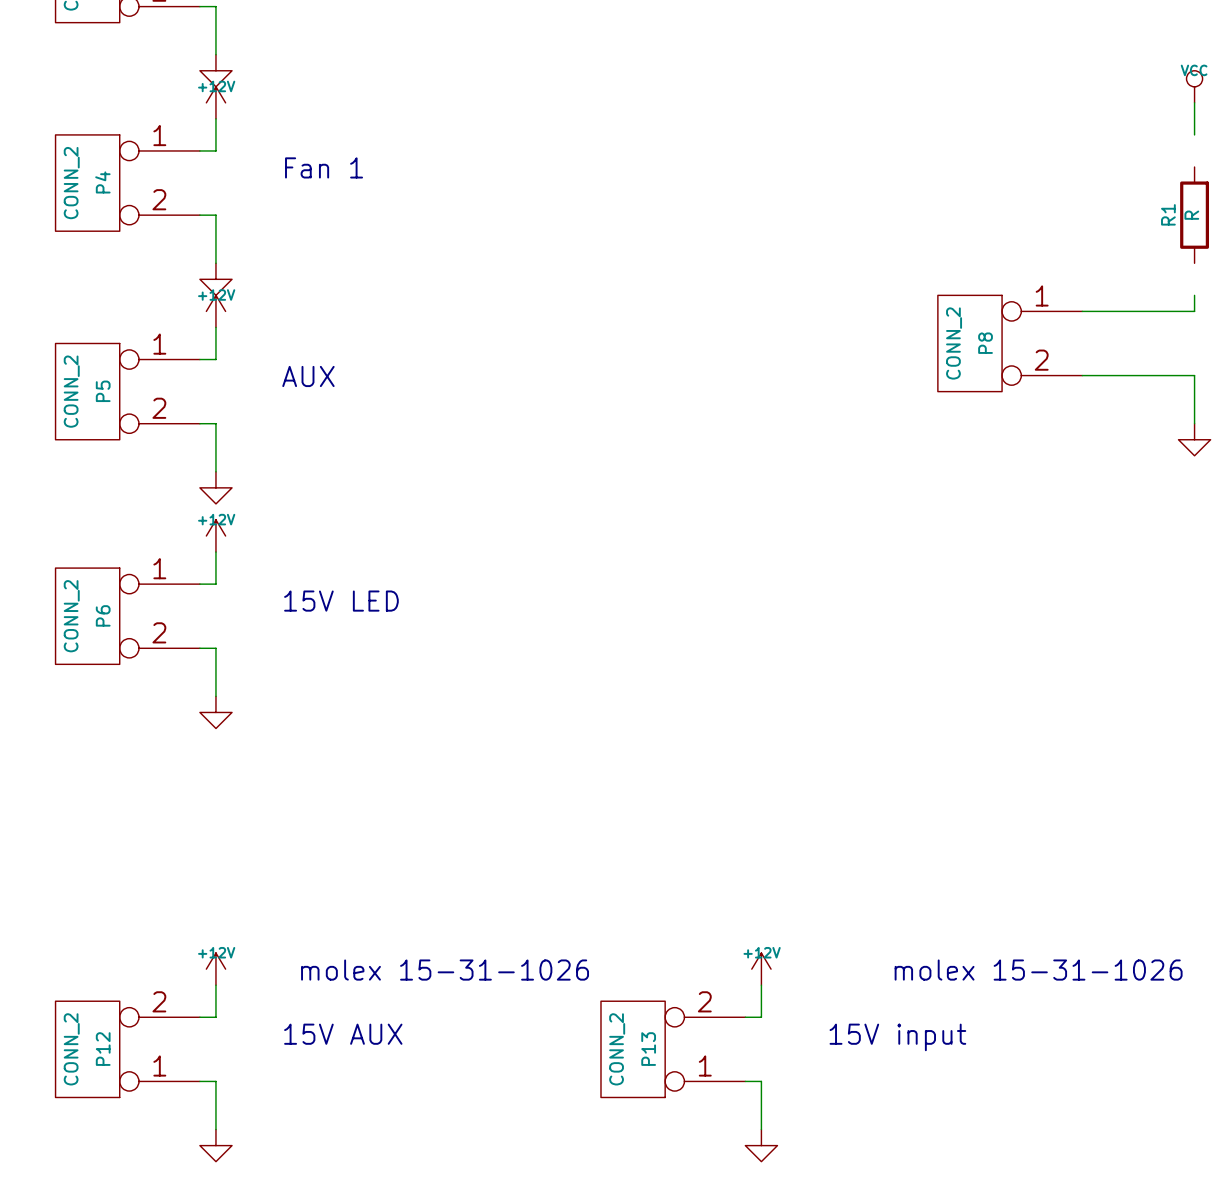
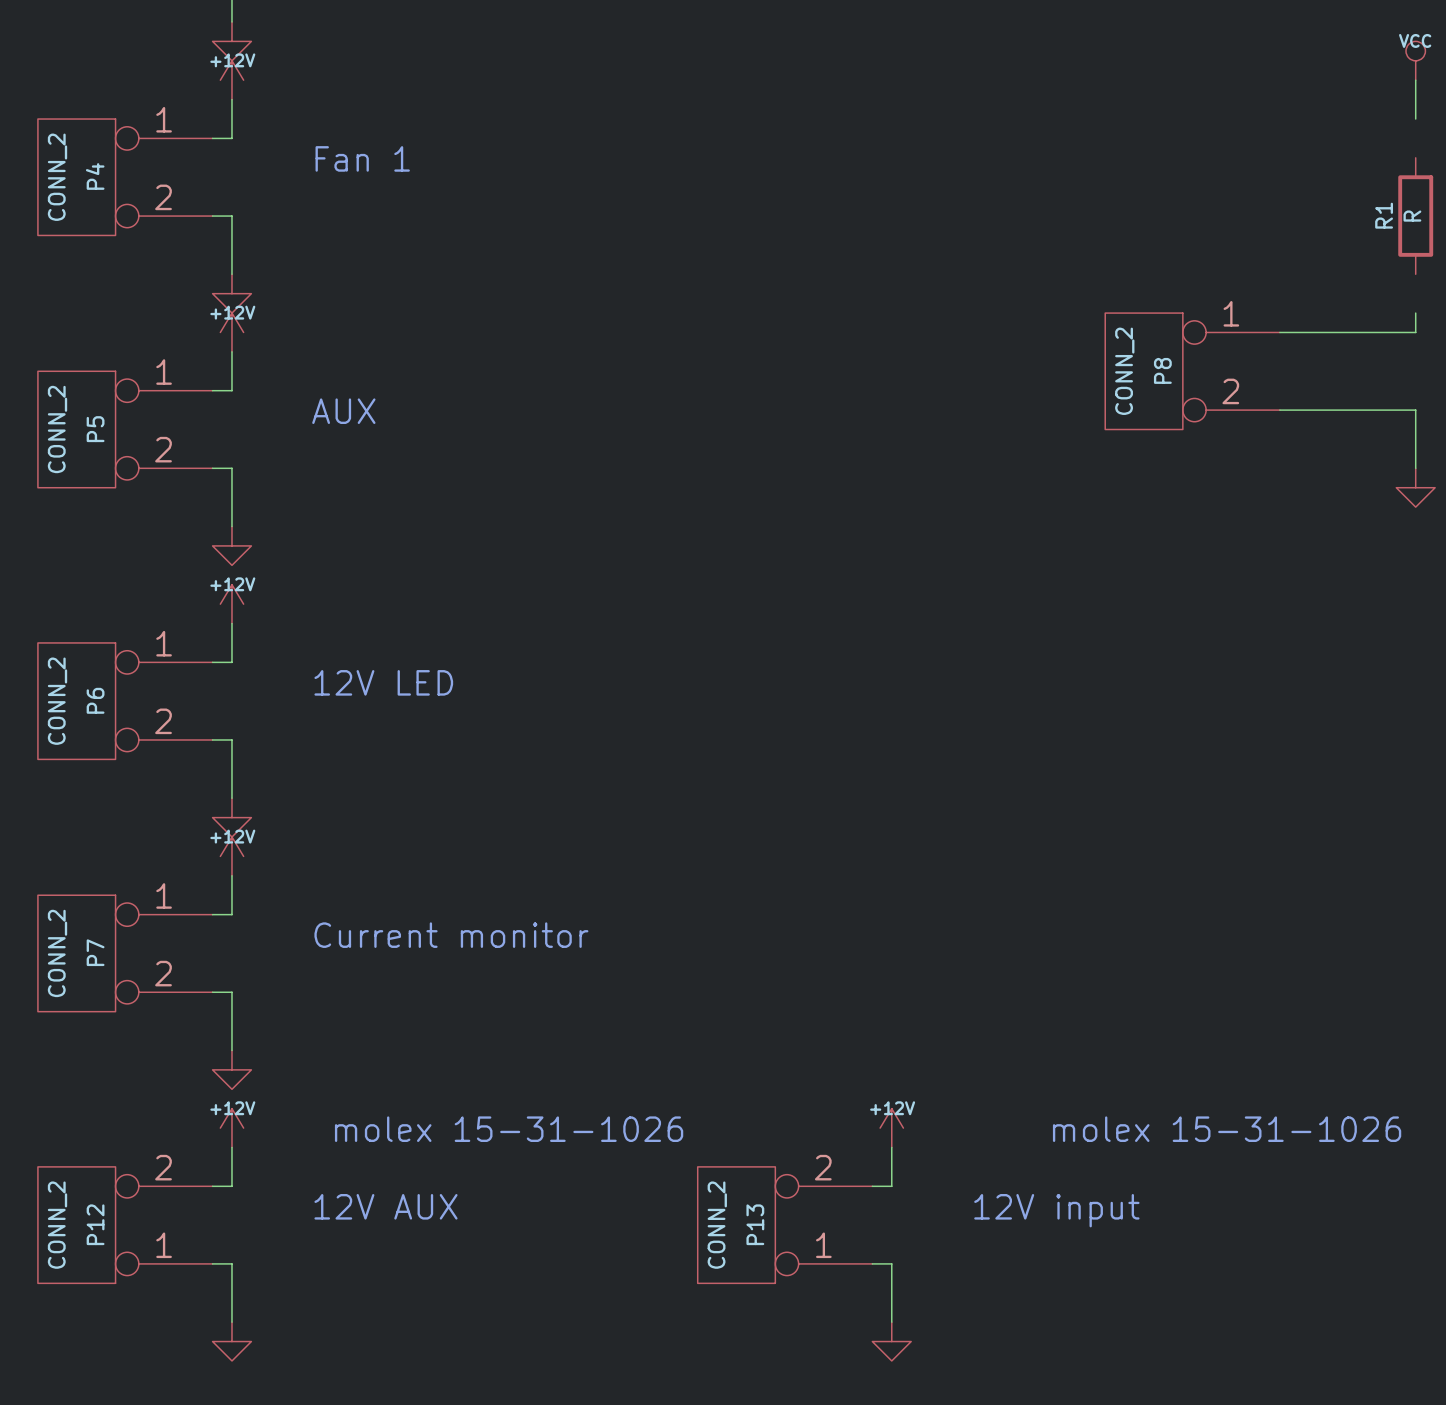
text: 15V LED (341, 601) -> 12V LED (383, 682)
power symbol: none -> +12V (231, 856)
wire: none -> (231, 875) (231, 914) (212, 914)
text: none -> Current monitor (451, 935)
P7: none -> CONN_2 (125, 953)
wire: none -> (212, 992) (231, 992) (231, 1050)
power symbol: none -> (231, 1069)
text: 15V AUX (343, 1034) -> 12V AUX (385, 1206)
text: 15V input (897, 1037) -> 12V input (1056, 1210)

